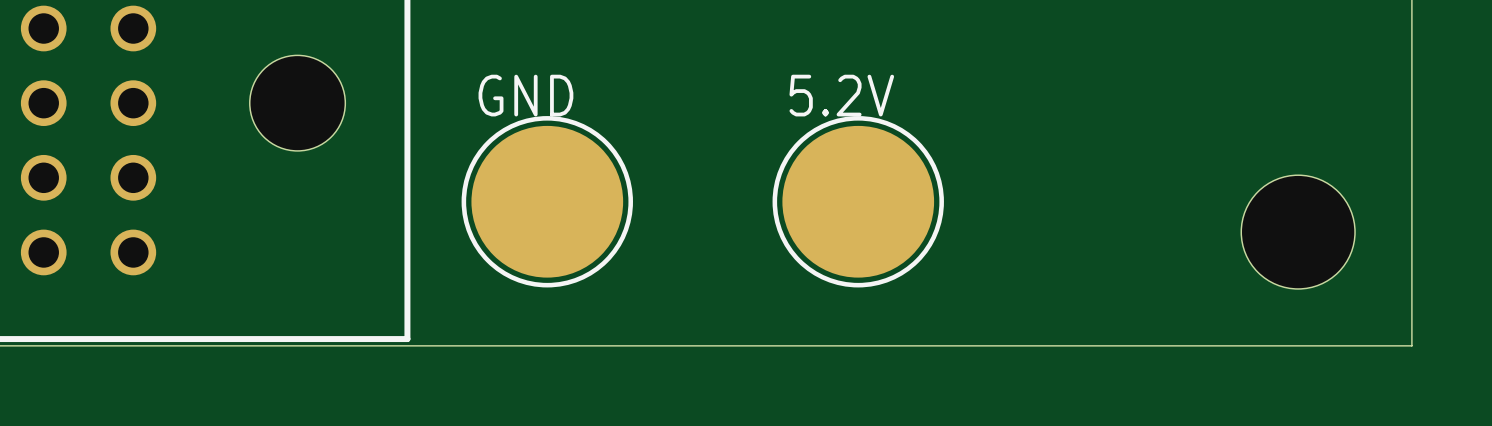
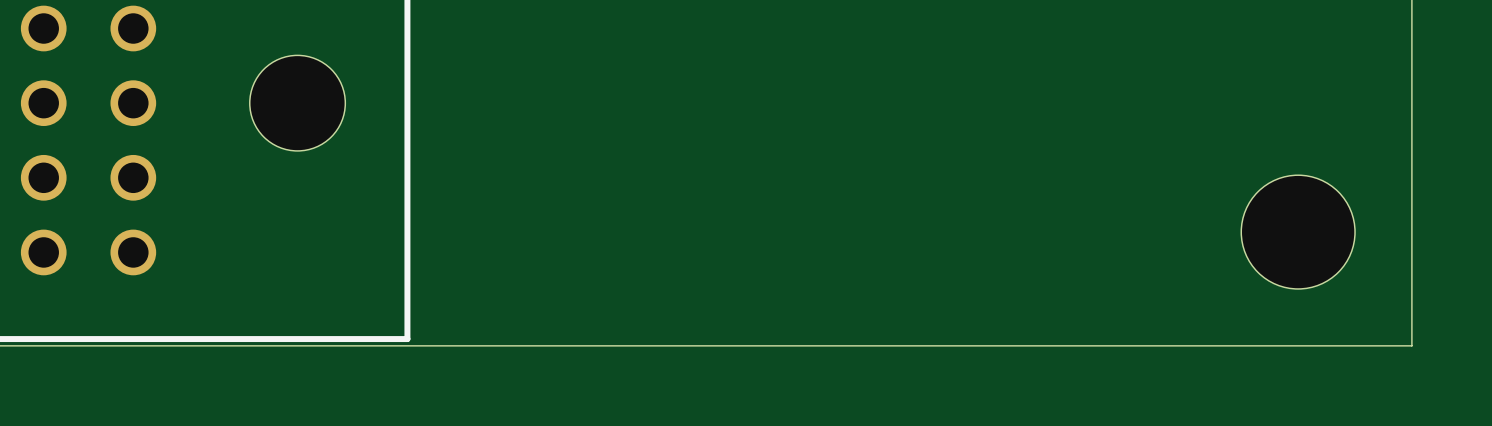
GND: (547, 201) -> none
5.2V: (858, 201) -> none

